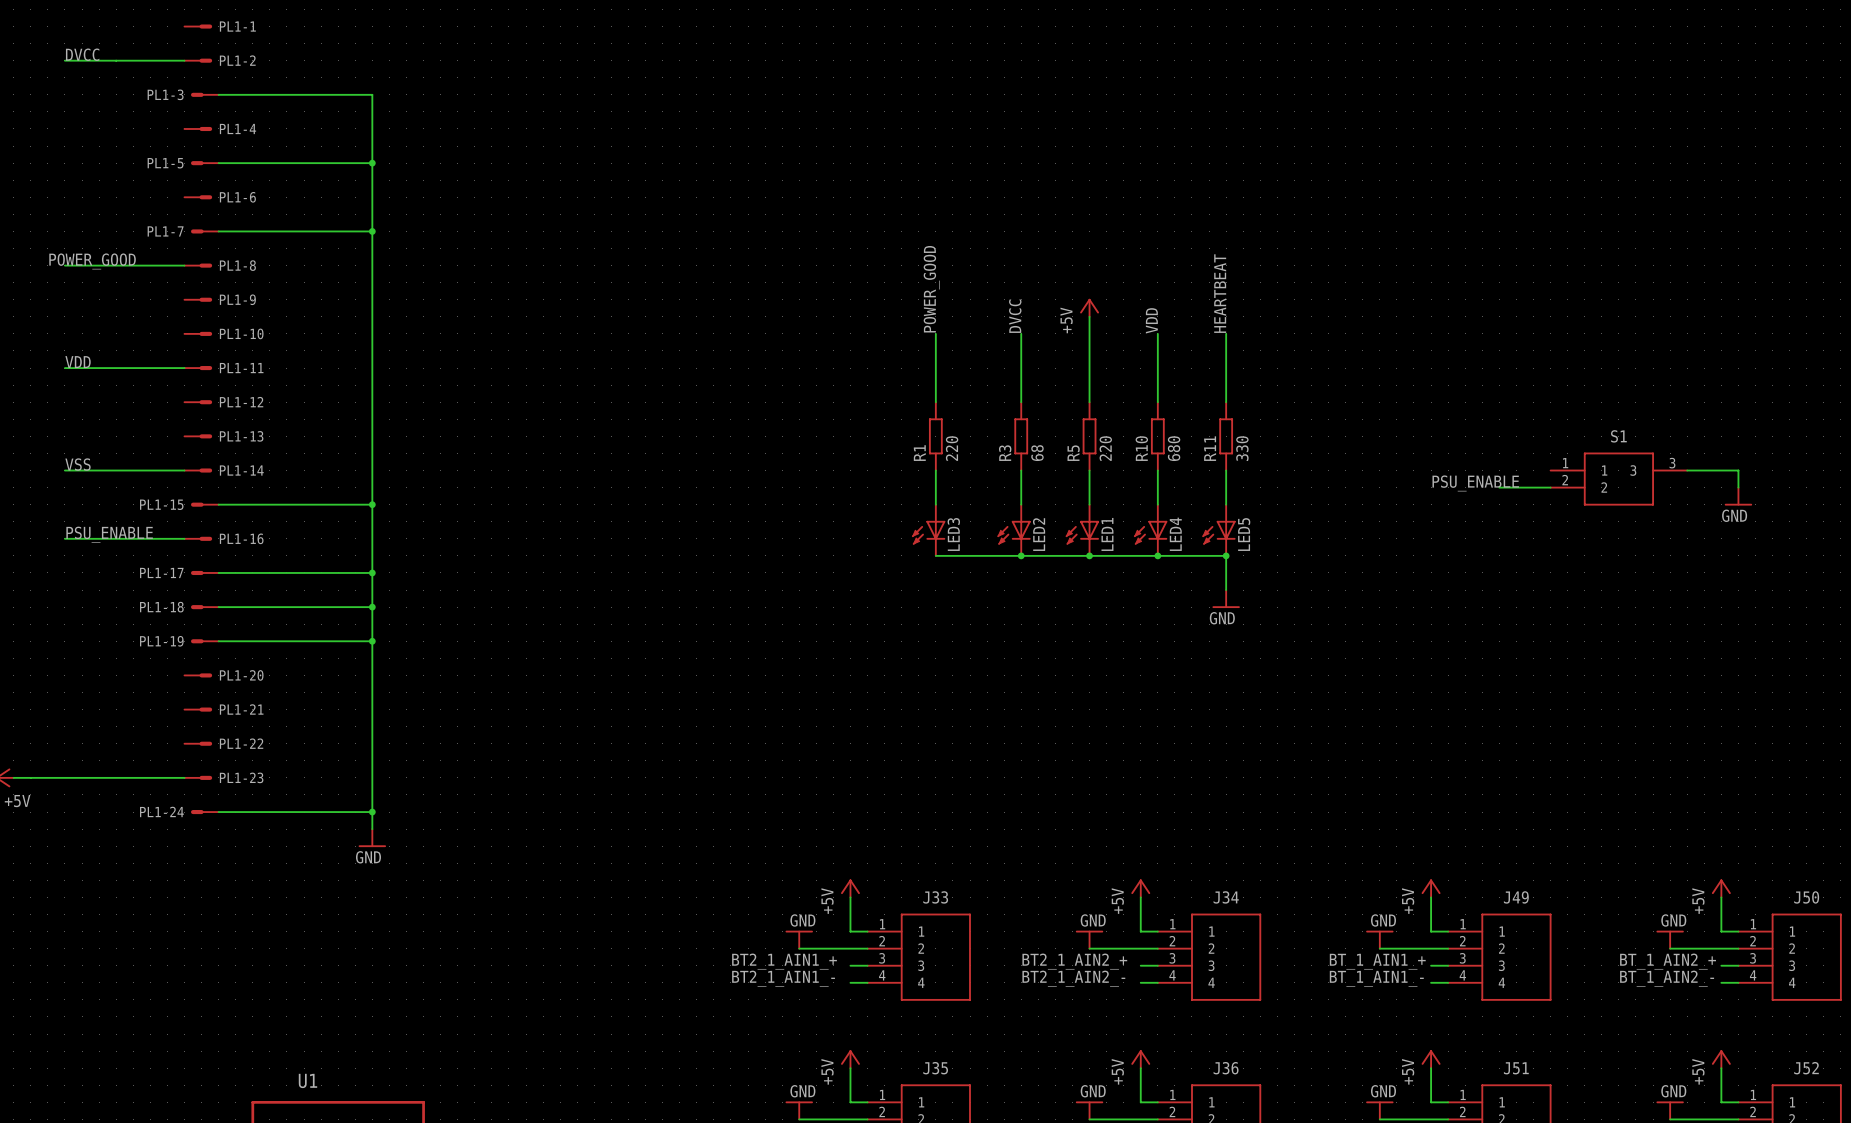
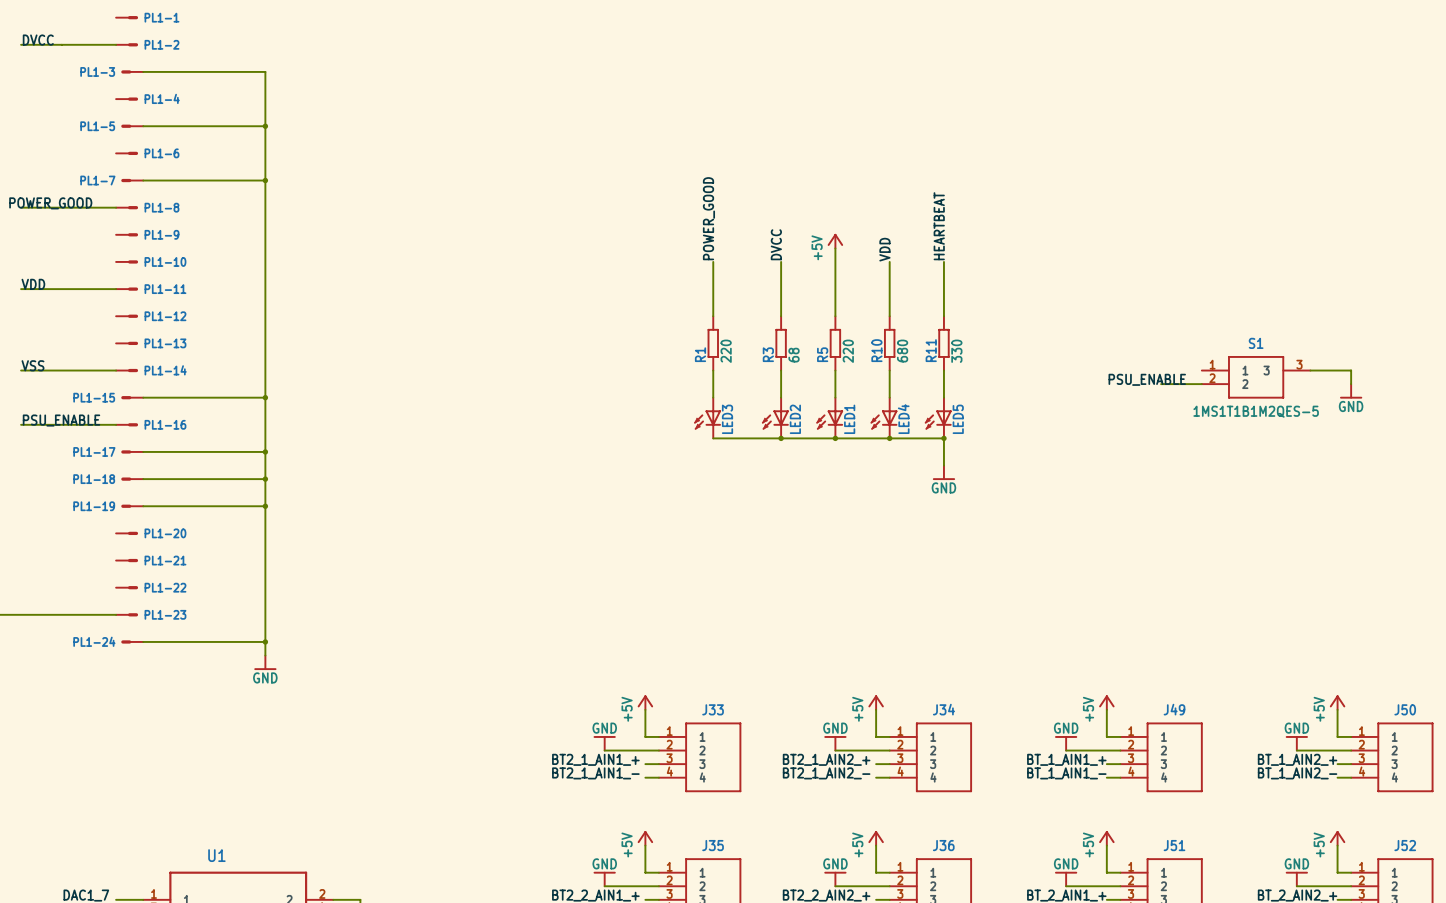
S1 value: none -> 1MS1T1B1M2QES-5 (1256, 411)

